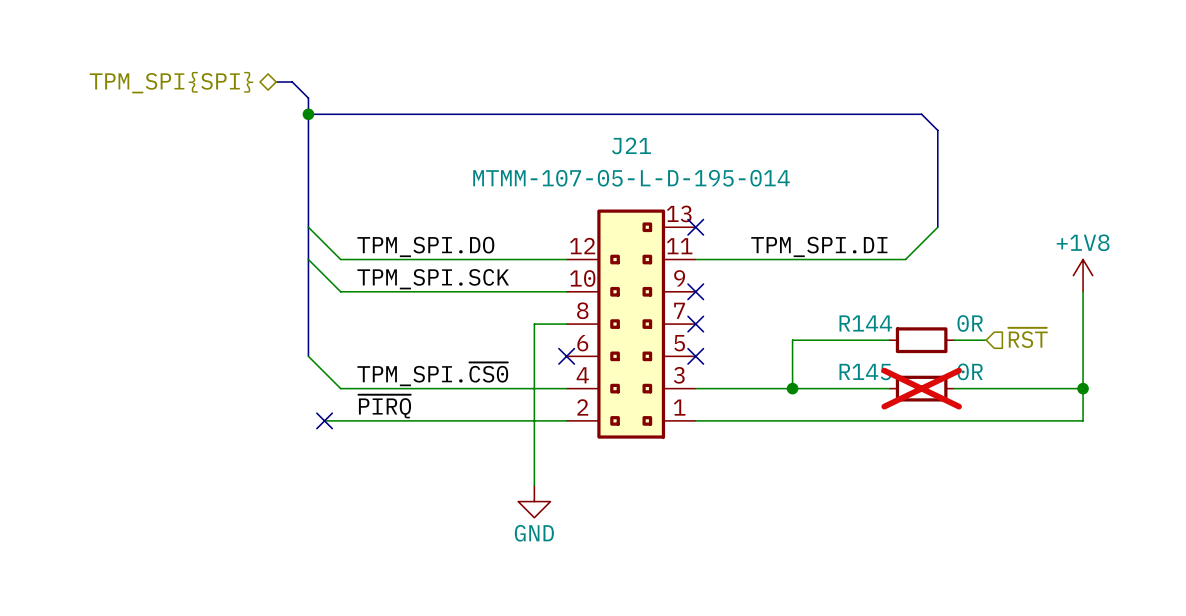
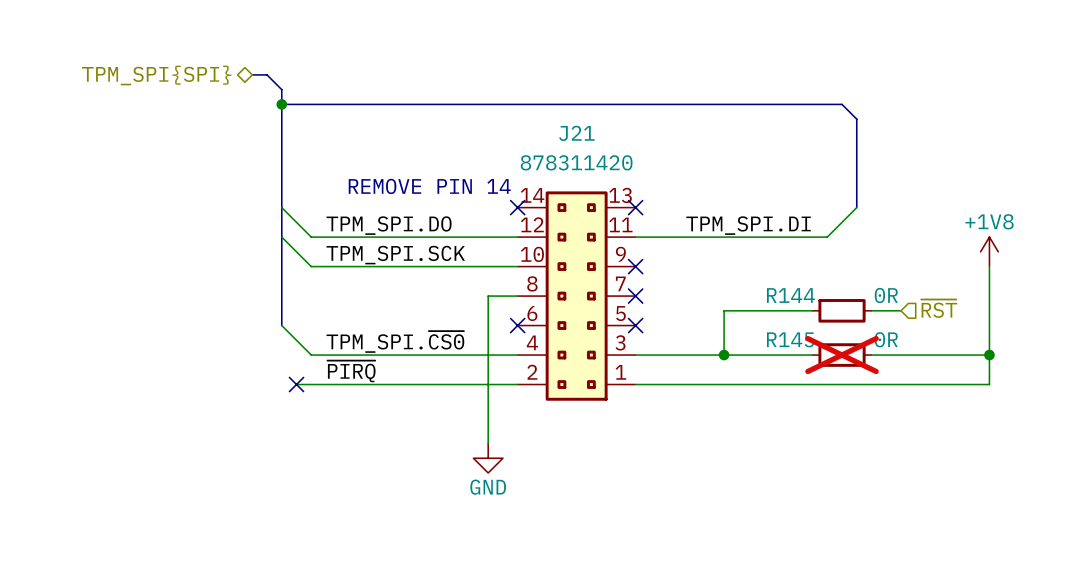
J21 text: MTMM-107-05-L-D-195-014 (631, 178) -> 878311420 (576, 162)
text: none -> REMOVE PIN 14 (429, 186)
J21 symbol: [566, 209, 696, 439] -> [517, 191, 636, 401]
no-connect mark: none -> (517, 207)

